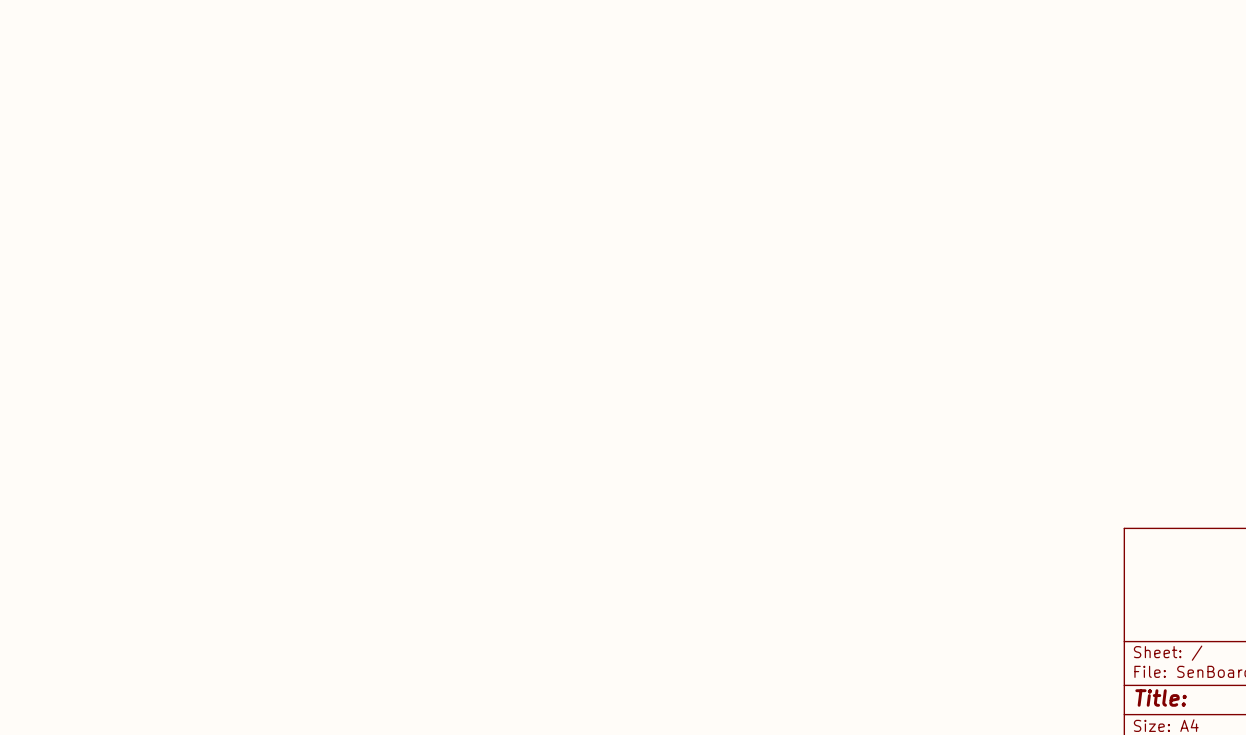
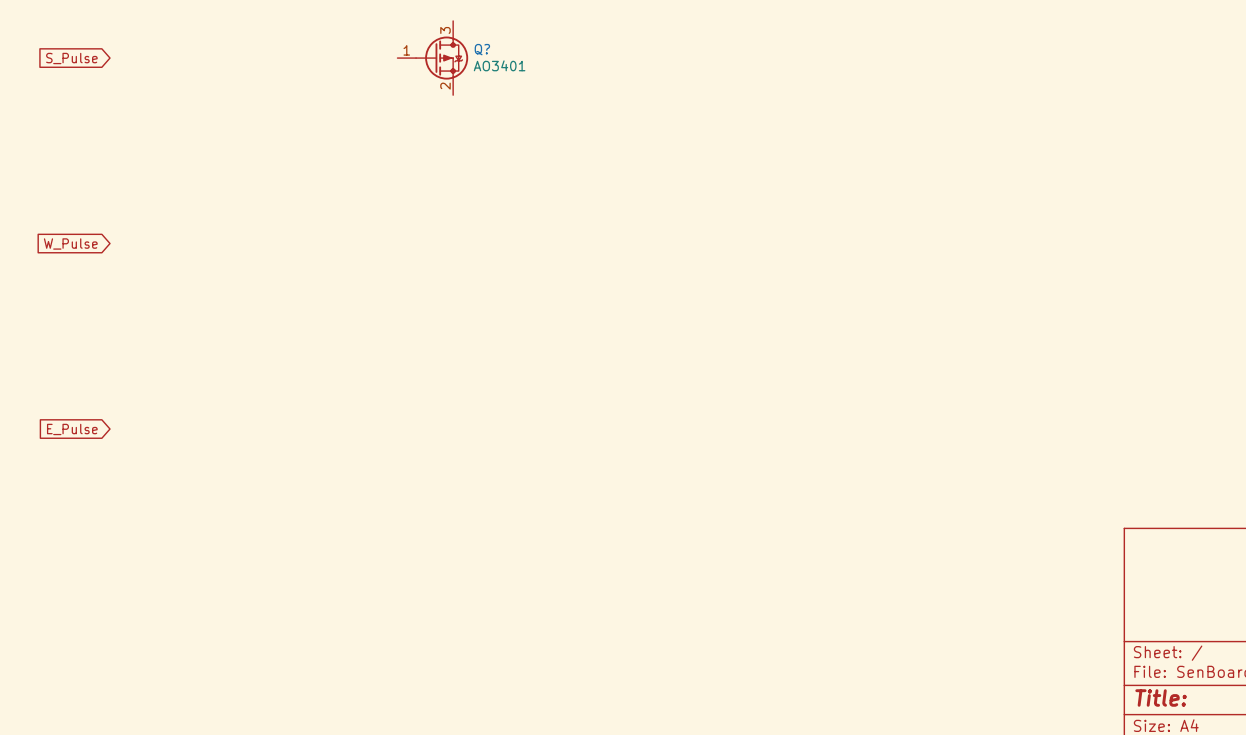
global label: none -> S_Pulse (71, 58)
Q?: none -> AO3401 (432, 58)
global label: none -> W_Pulse (70, 243)
global label: none -> E_Pulse (72, 429)

